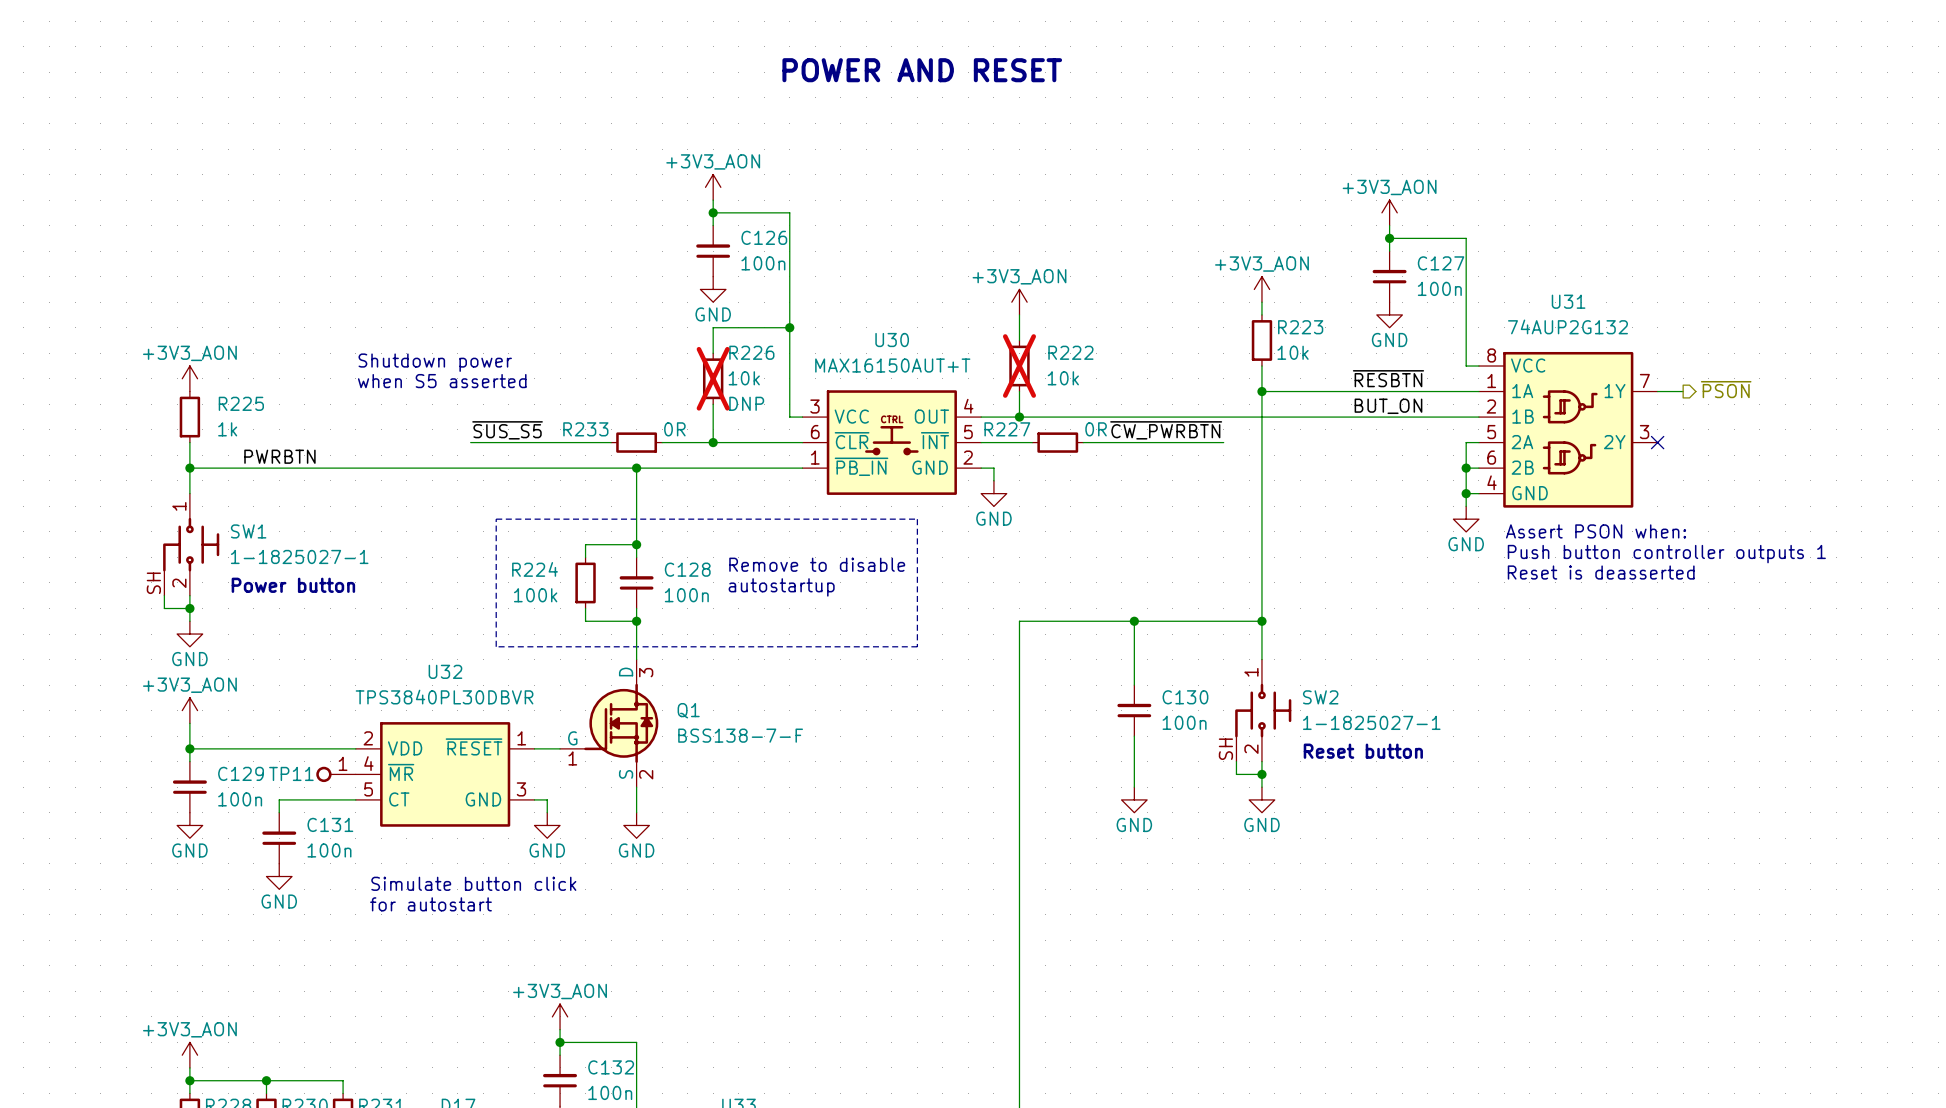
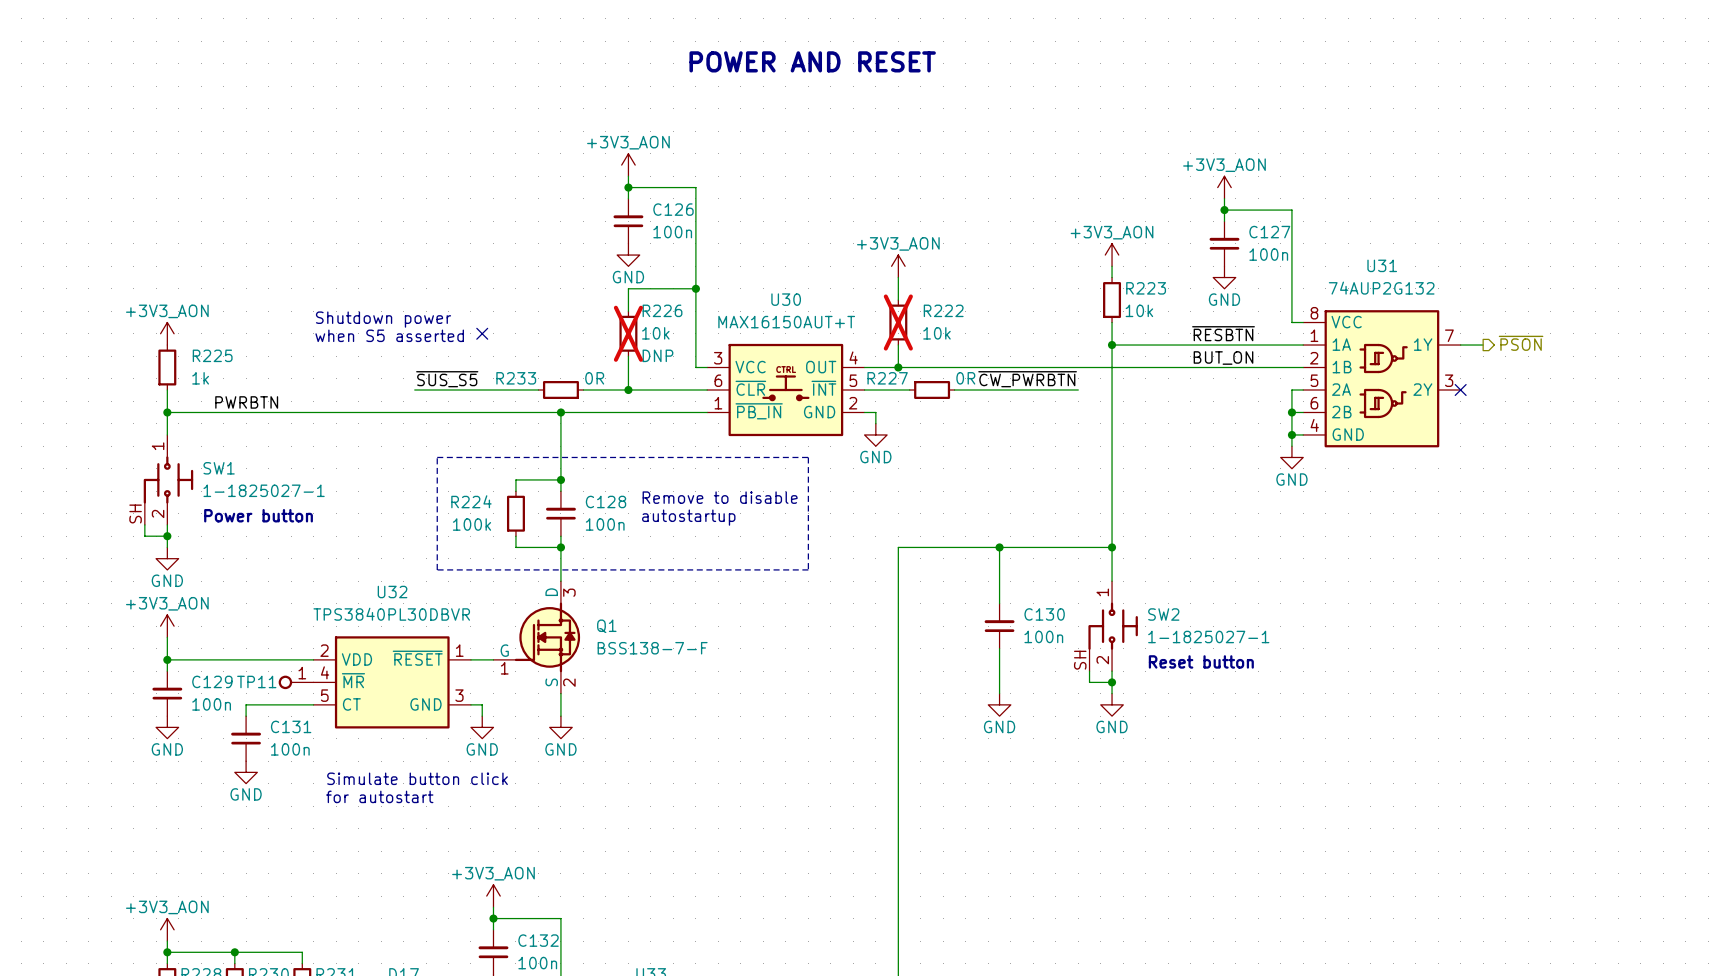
no-connect mark: none -> (482, 333)
text: Assert PSON when: (1596, 531) -> none
text: Push button controller outputs 1 (1666, 554) -> none
text: Reset is deasserted (1601, 572) -> none

